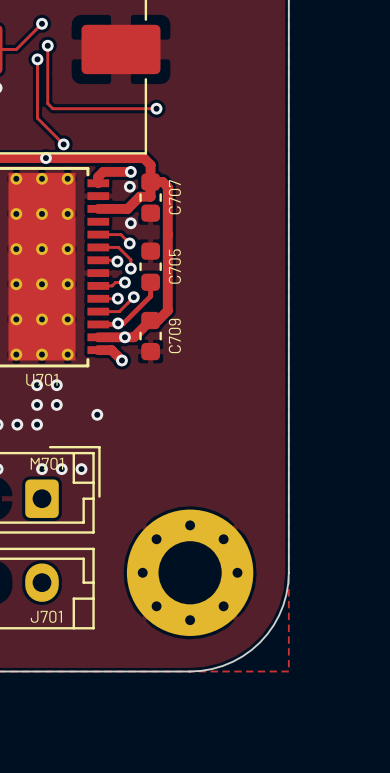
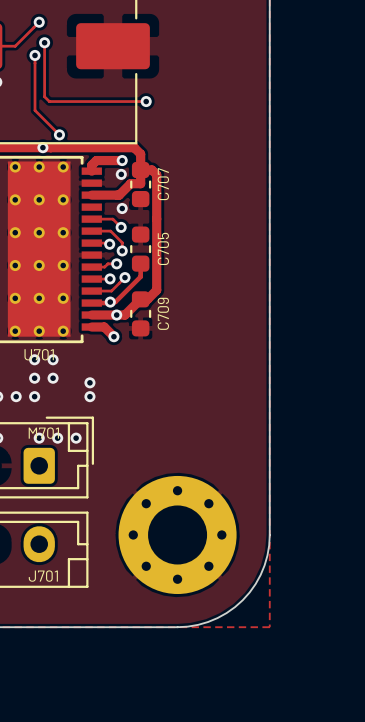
via: none -> (89, 382)
via: (97, 414) -> none
via: none -> (89, 396)

